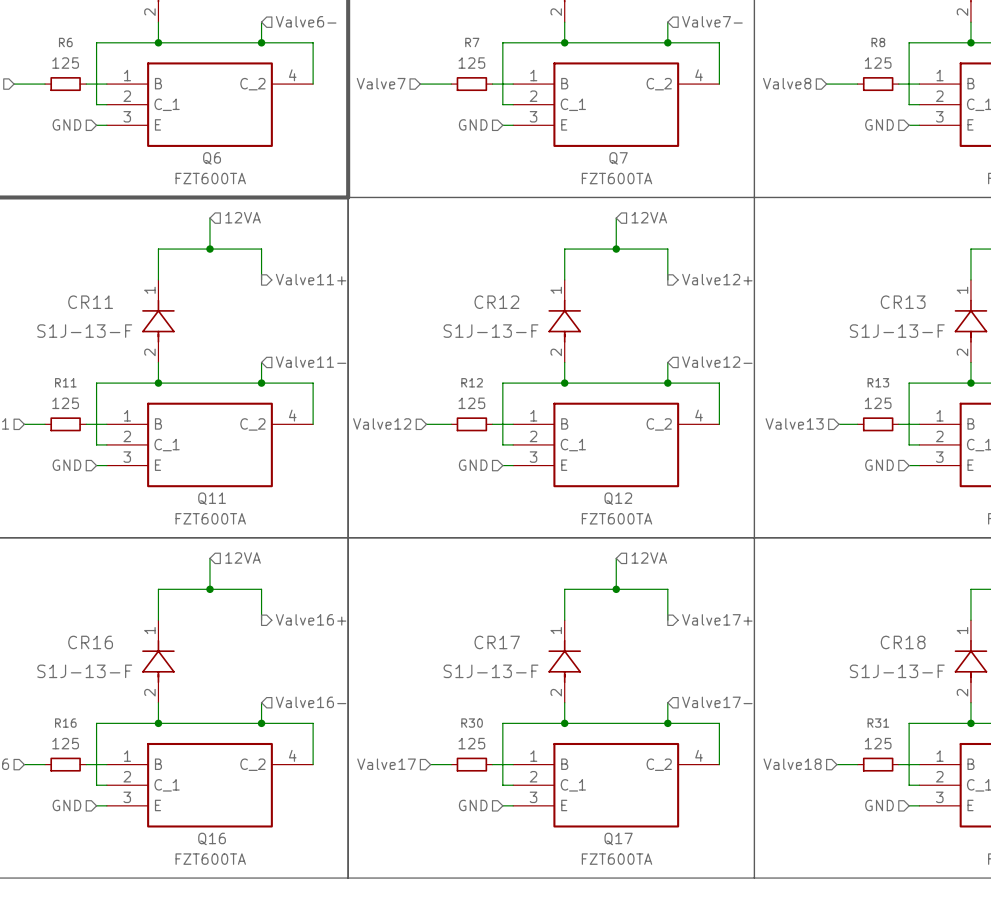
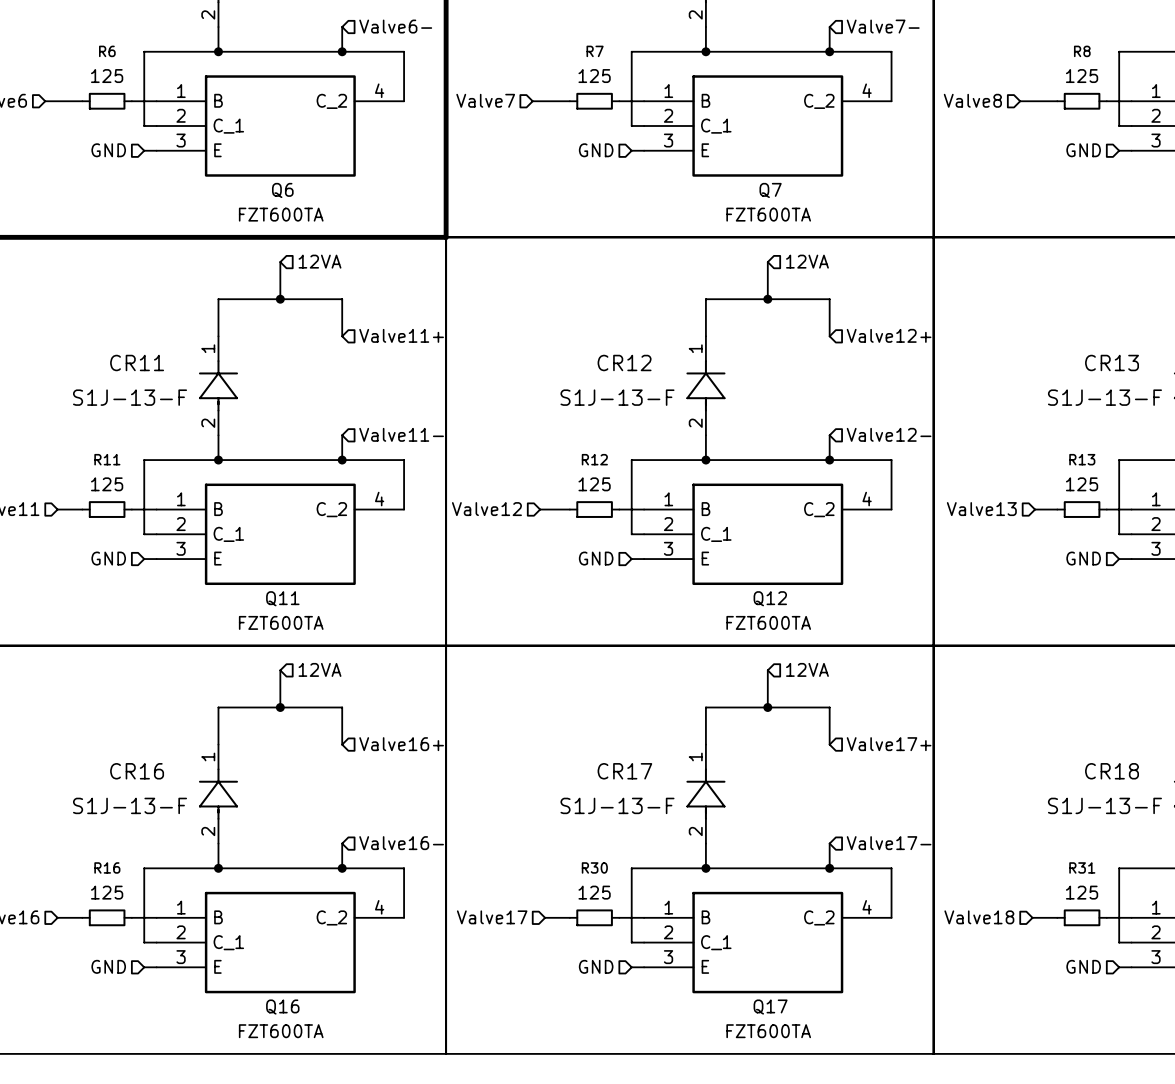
hierarchical label shape: output (311, 279) -> input (401, 335)
hierarchical label shape: output (717, 279) -> input (889, 335)
hierarchical label shape: output (311, 619) -> input (401, 744)
hierarchical label shape: output (717, 619) -> input (889, 744)

